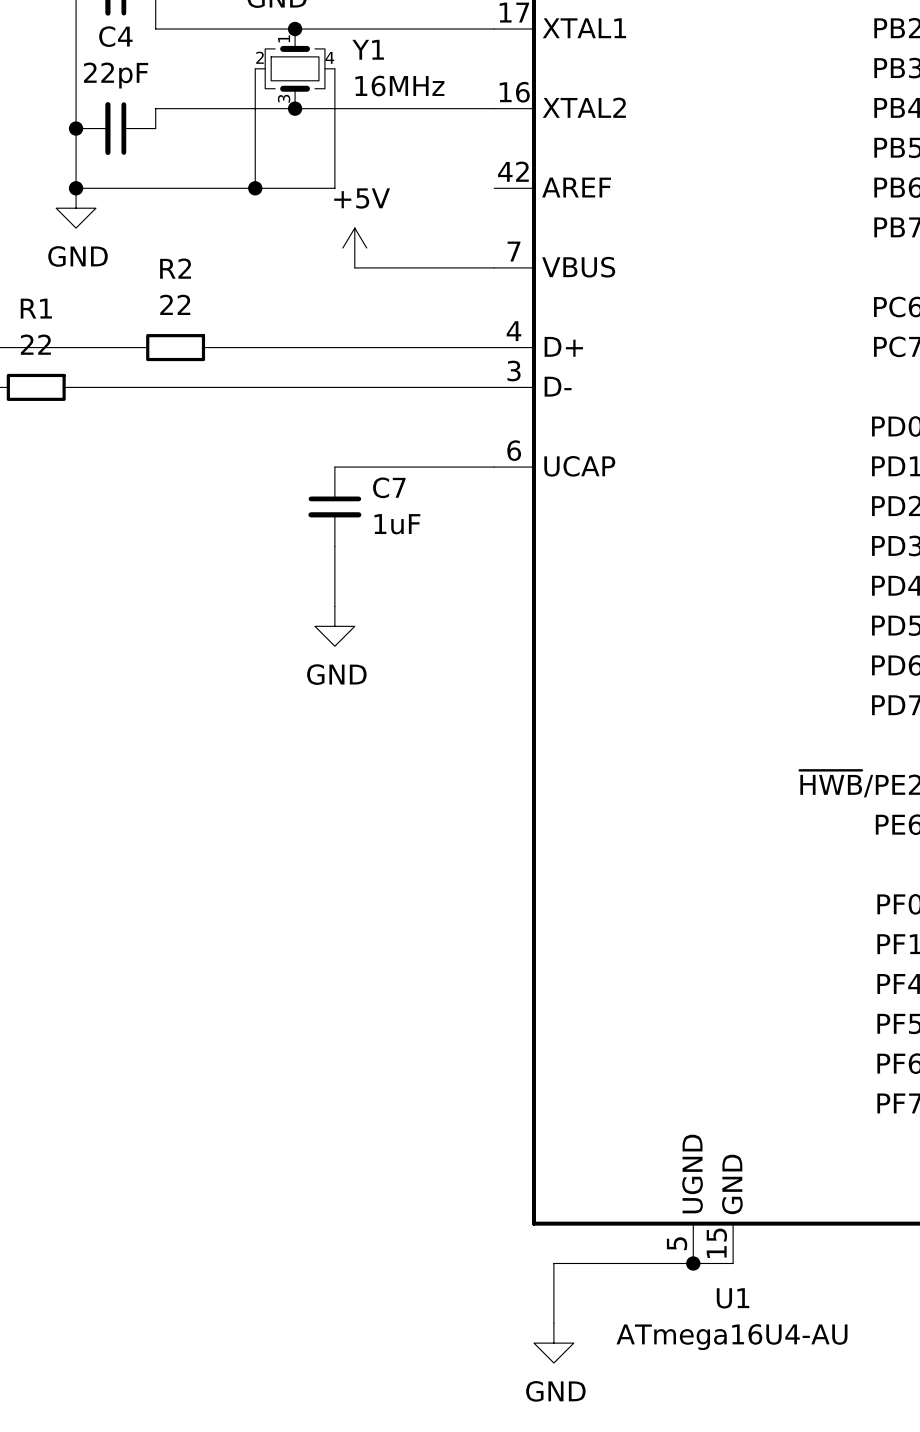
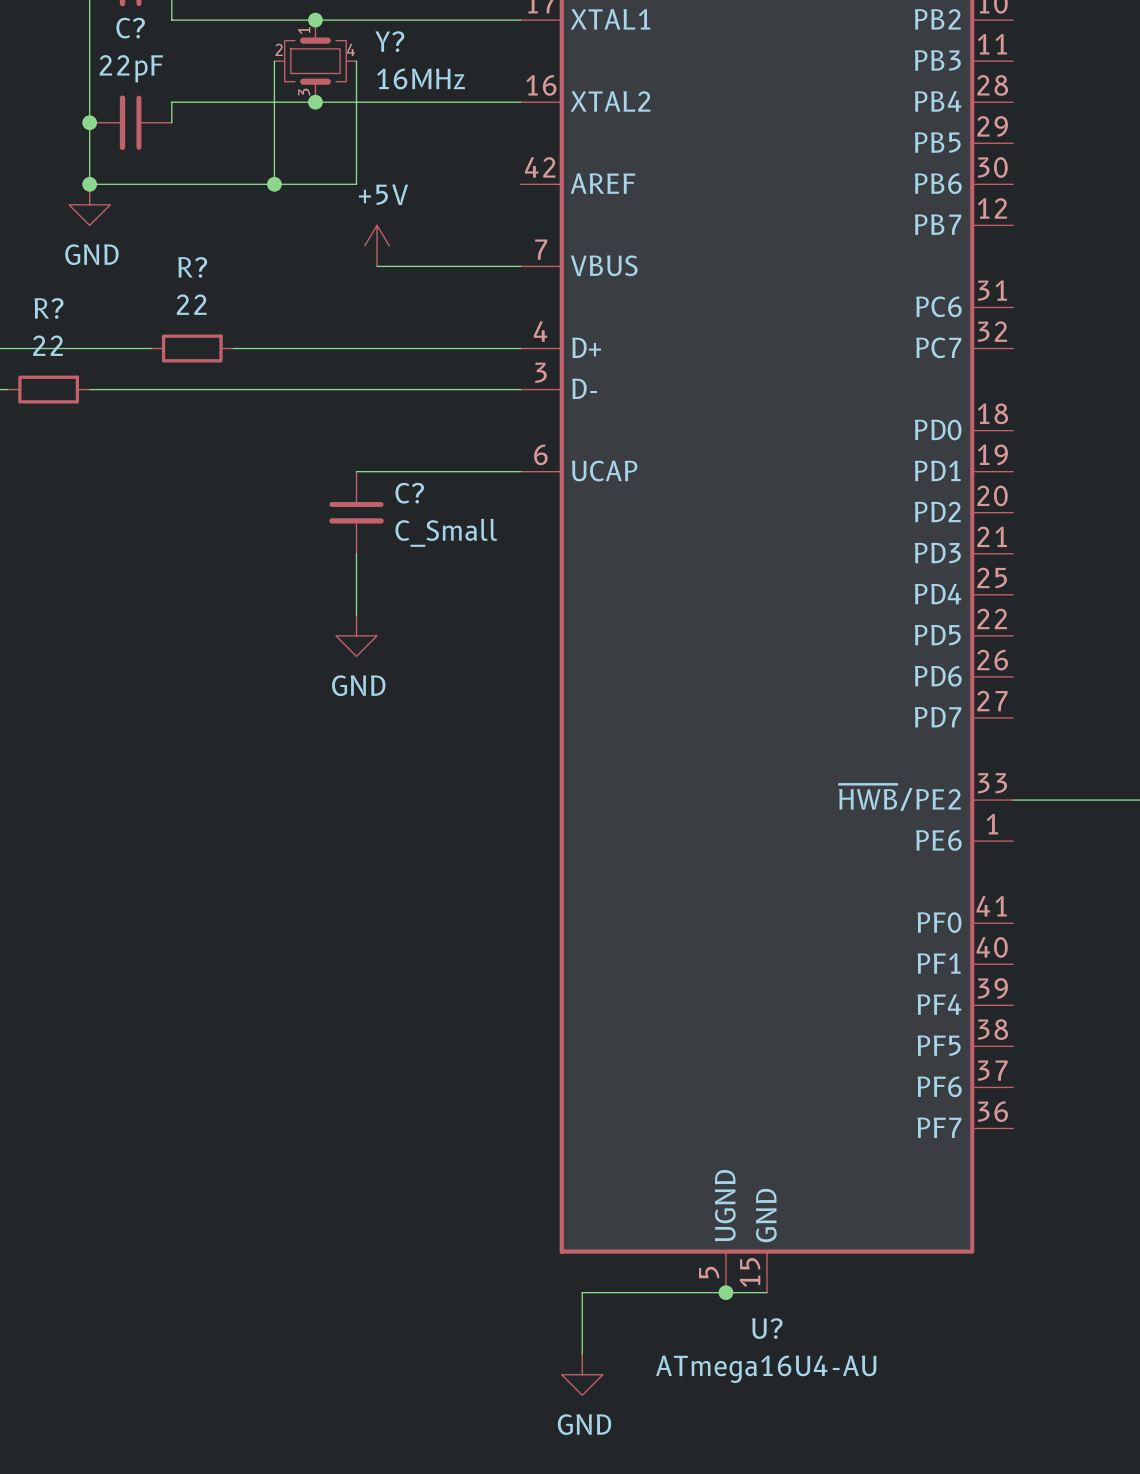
C4 name: C4 (115, 36) -> C? (130, 28)
Y1 name: Y1 (368, 49) -> Y? (389, 41)
R2 name: R2 (175, 268) -> R? (192, 267)
R1 name: R1 (36, 308) -> R? (48, 308)
C7 name: C7 (389, 487) -> C? (409, 493)
C7 value: 1uF (397, 524) -> C_Small (446, 532)
U1 name: U1 (733, 1298) -> U? (767, 1328)

